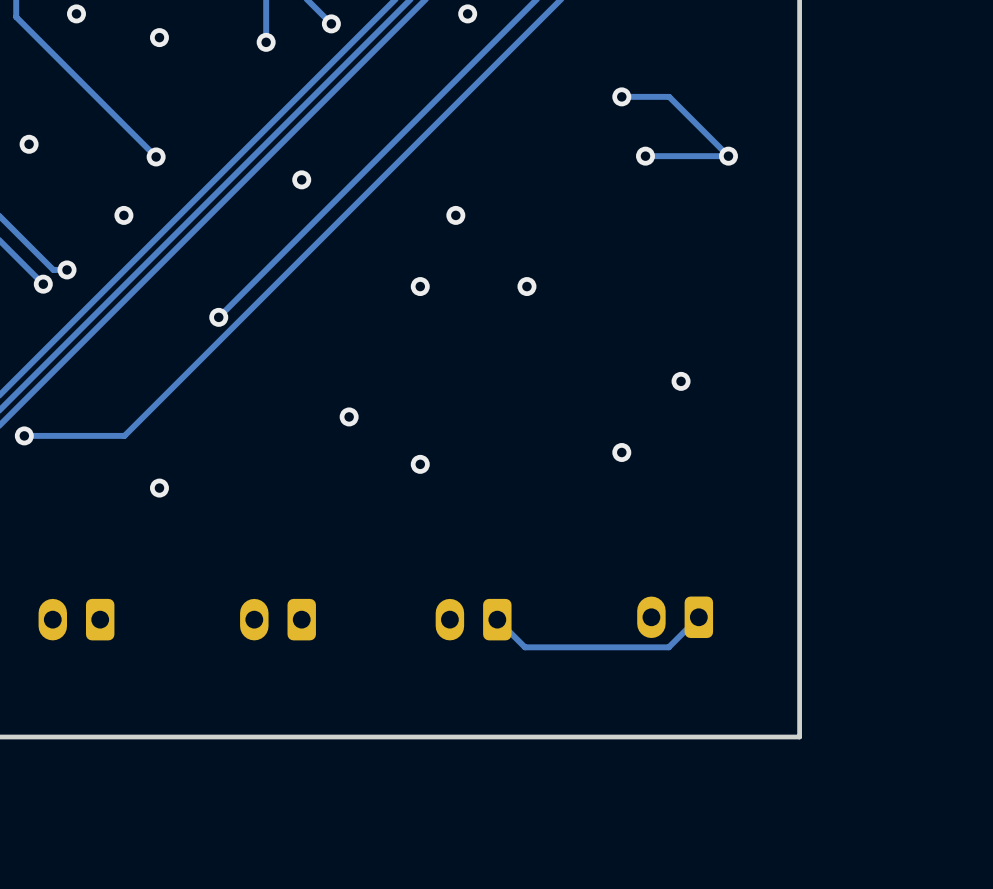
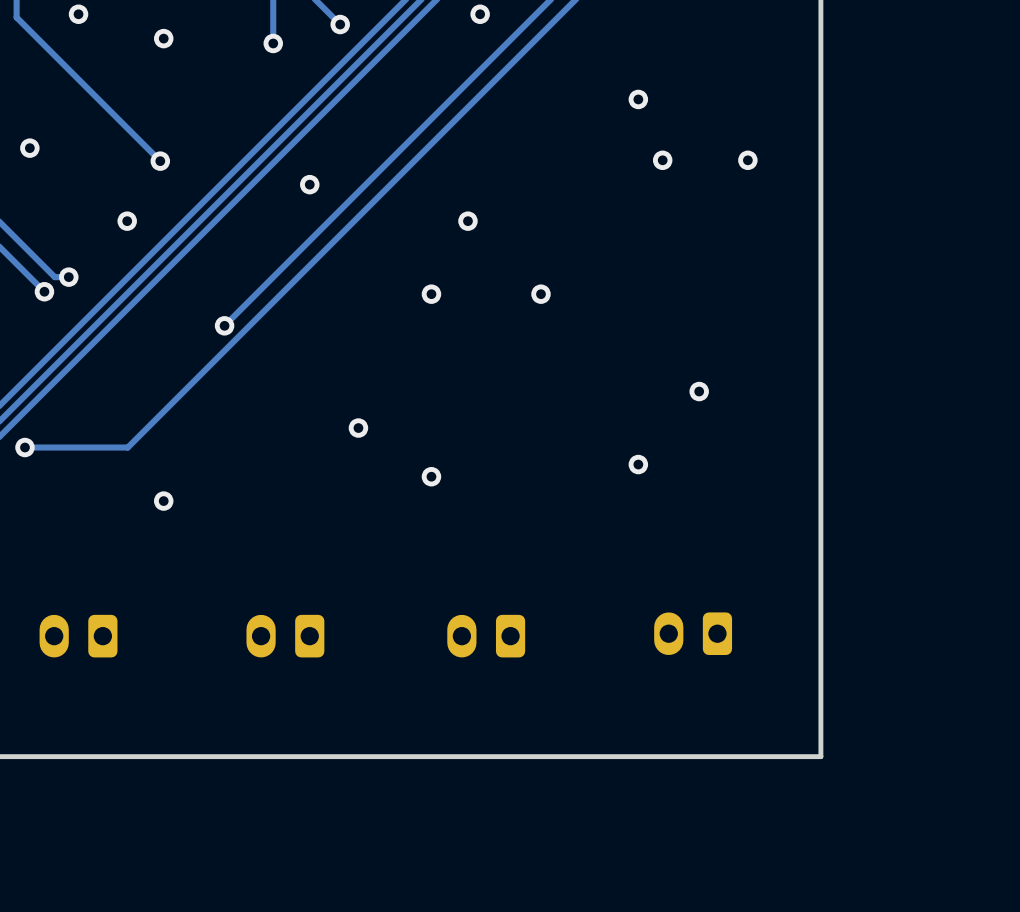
track: (621, 96) (669, 96) (728, 156) (645, 156) -> none
track: (698, 617) (668, 647) (524, 647) (497, 619) -> none

